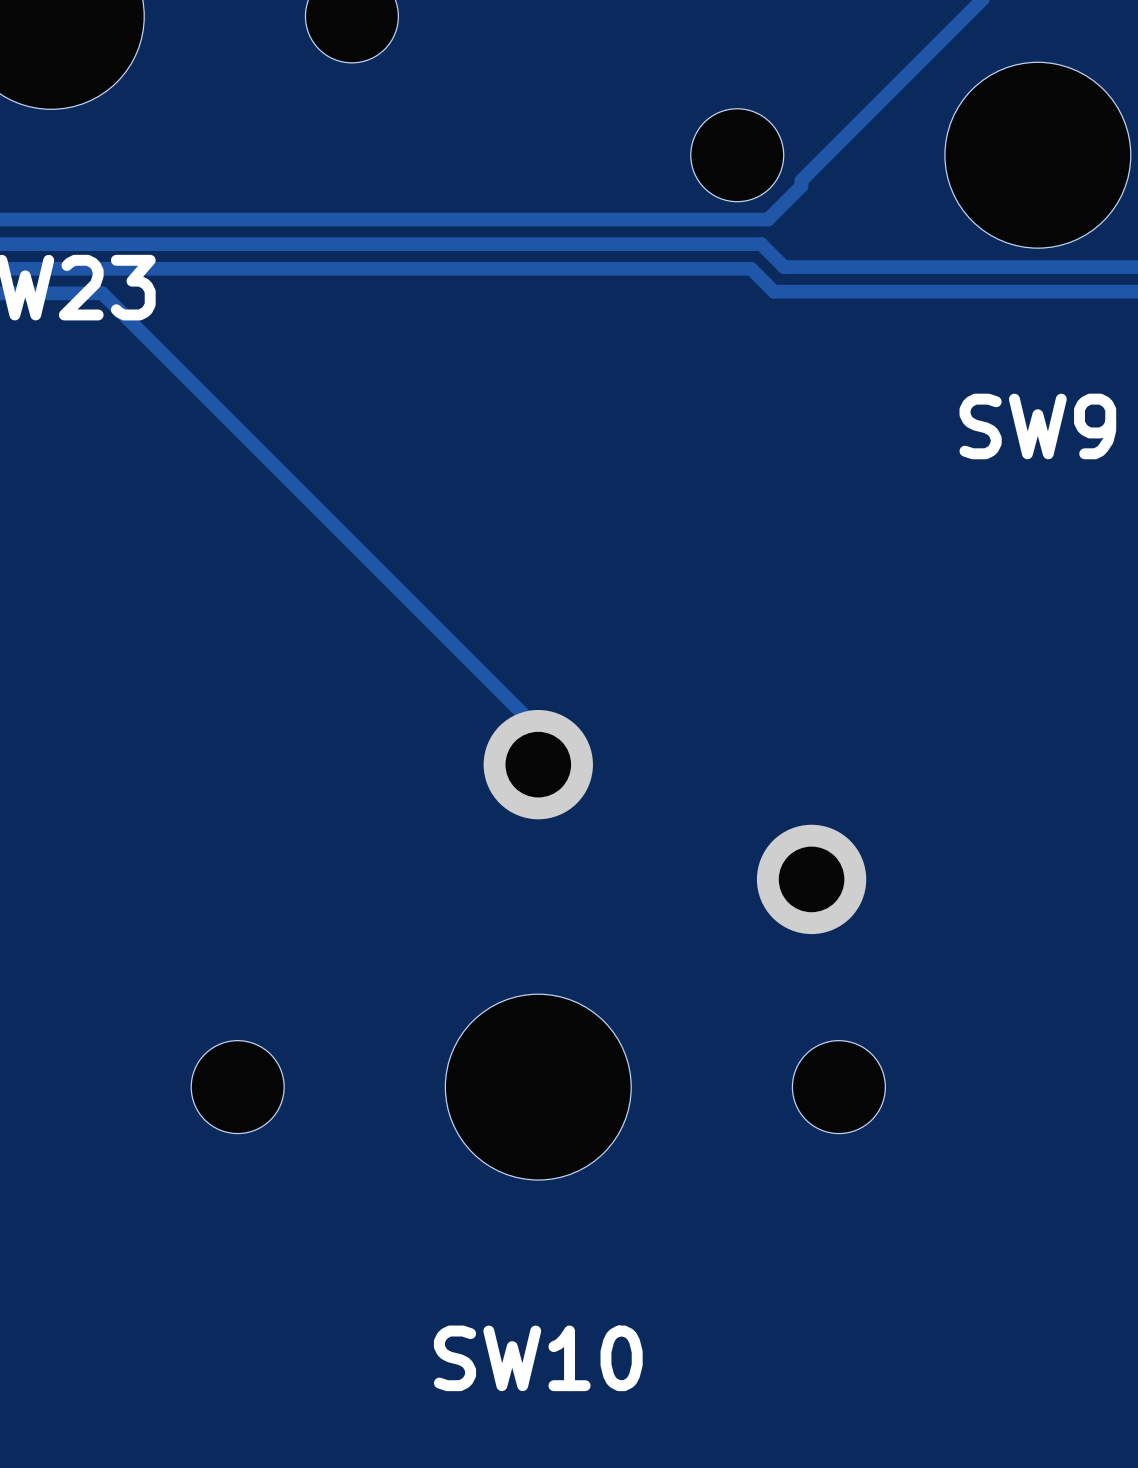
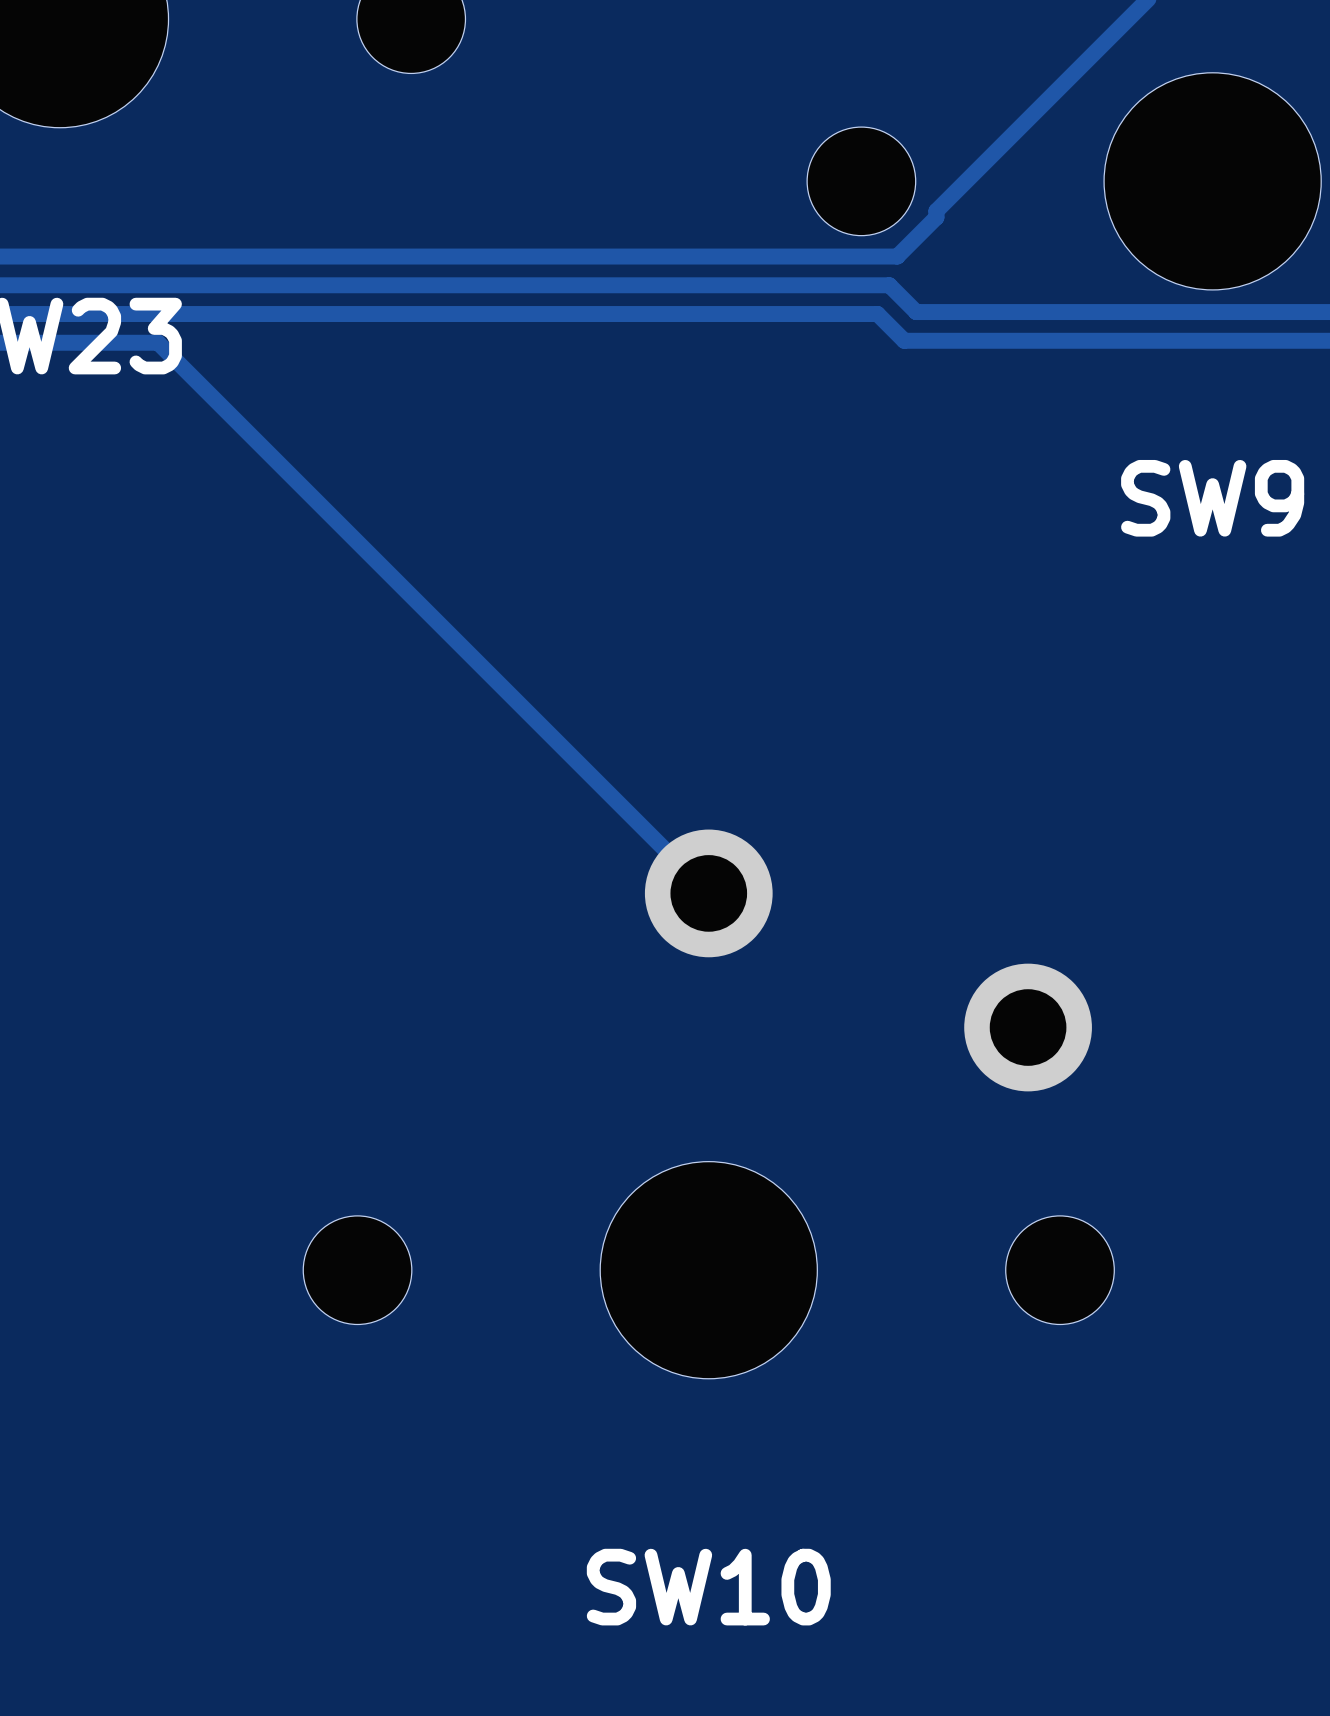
track: (102, 293) (573, 764) -> (119, 342) (158, 342) (708, 893)
SW10 position: (538, 945) -> (708, 1104)

